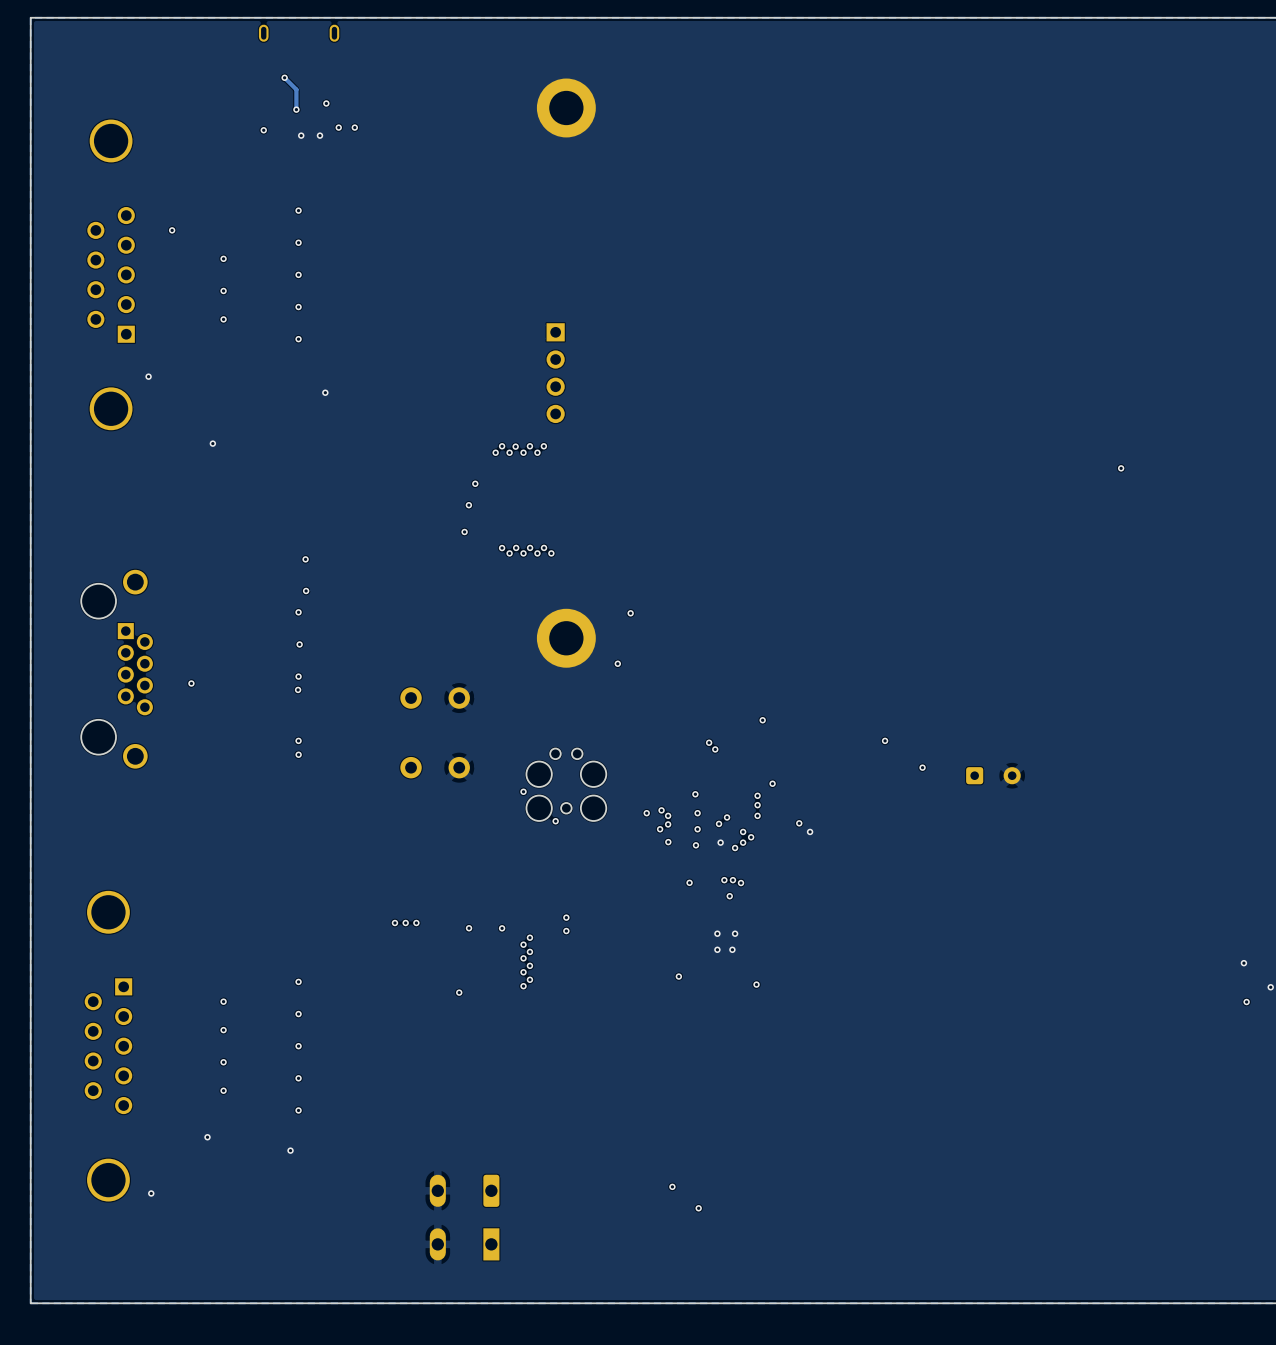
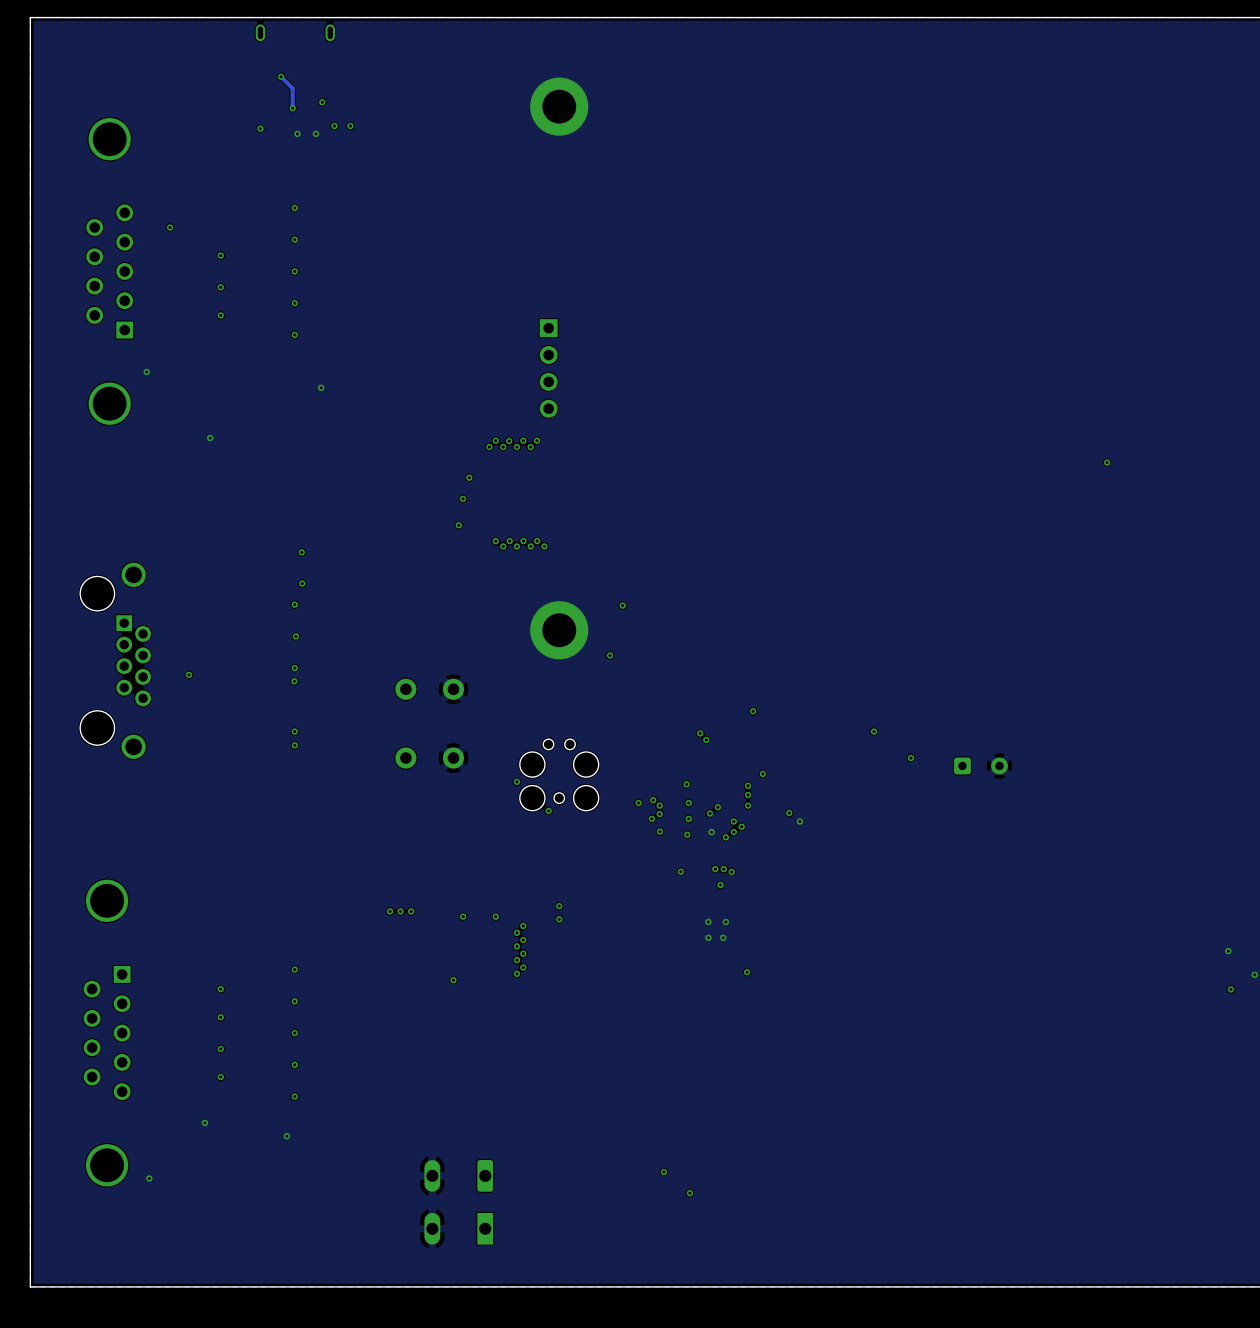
via: (678, 976) -> none

